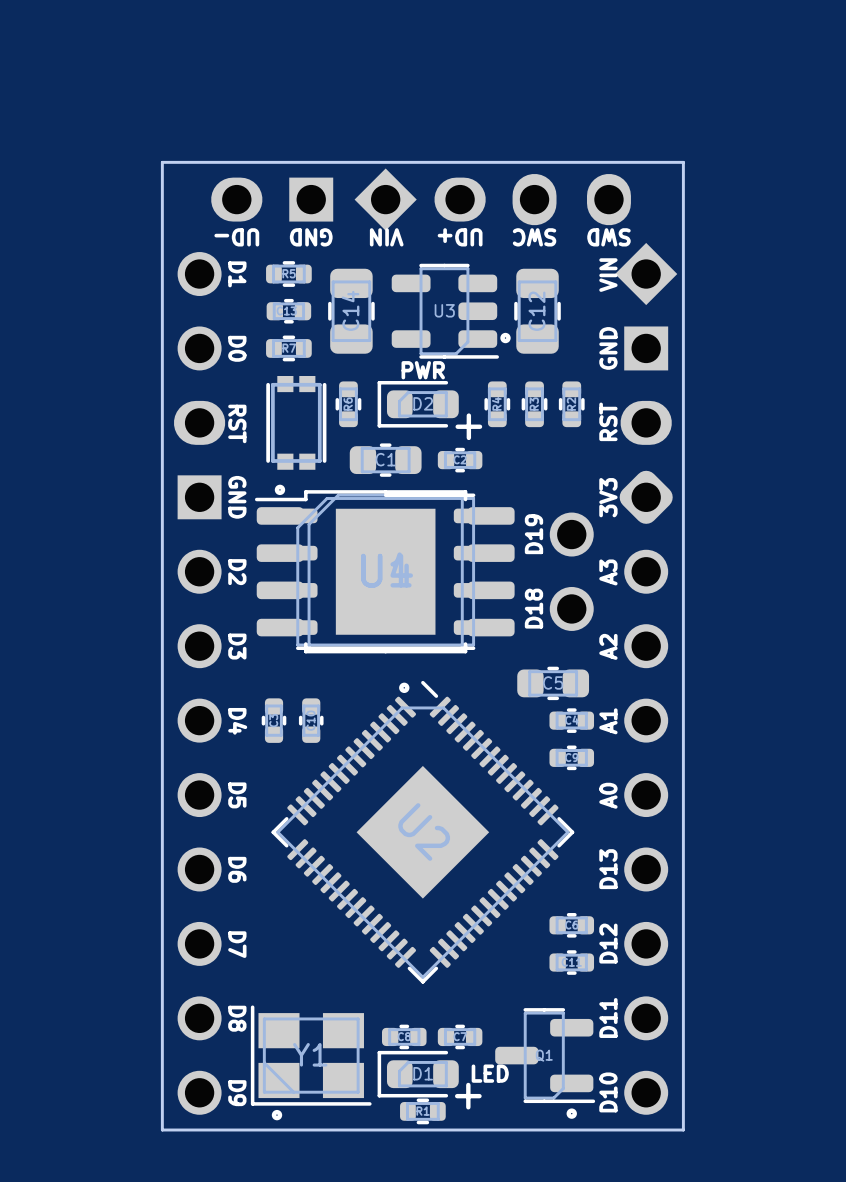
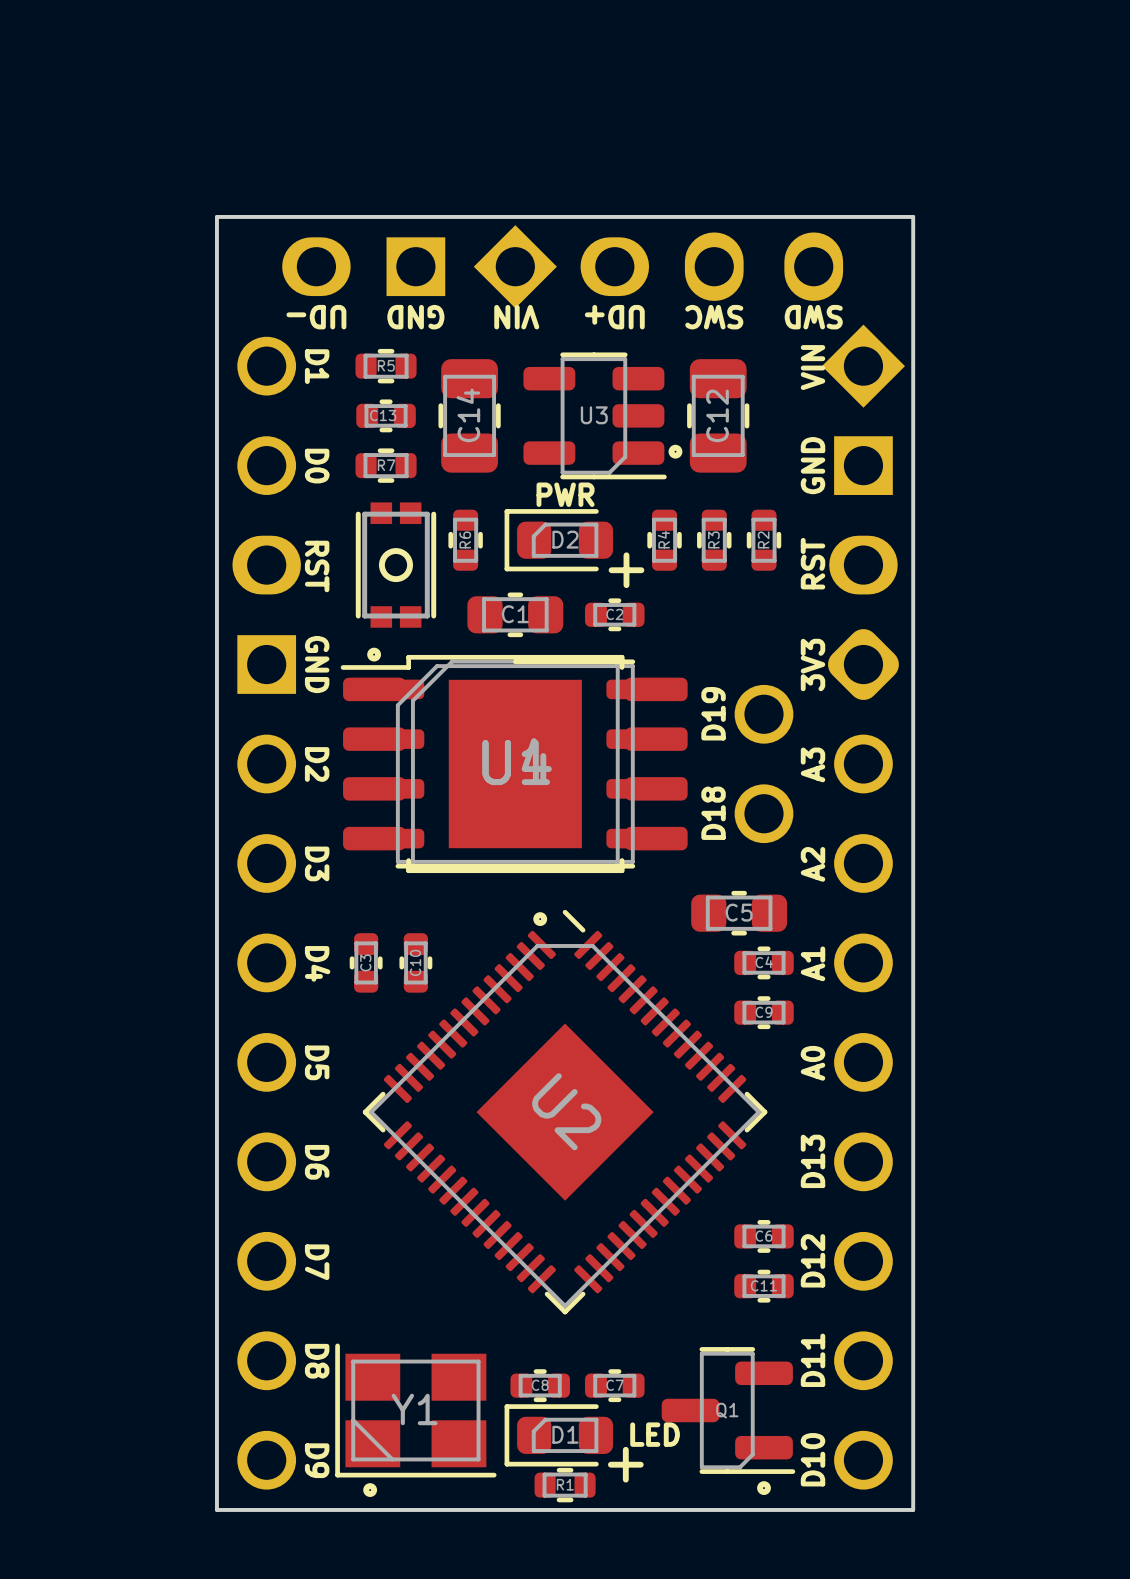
drawing: none -> [378, 548, 413, 583]

